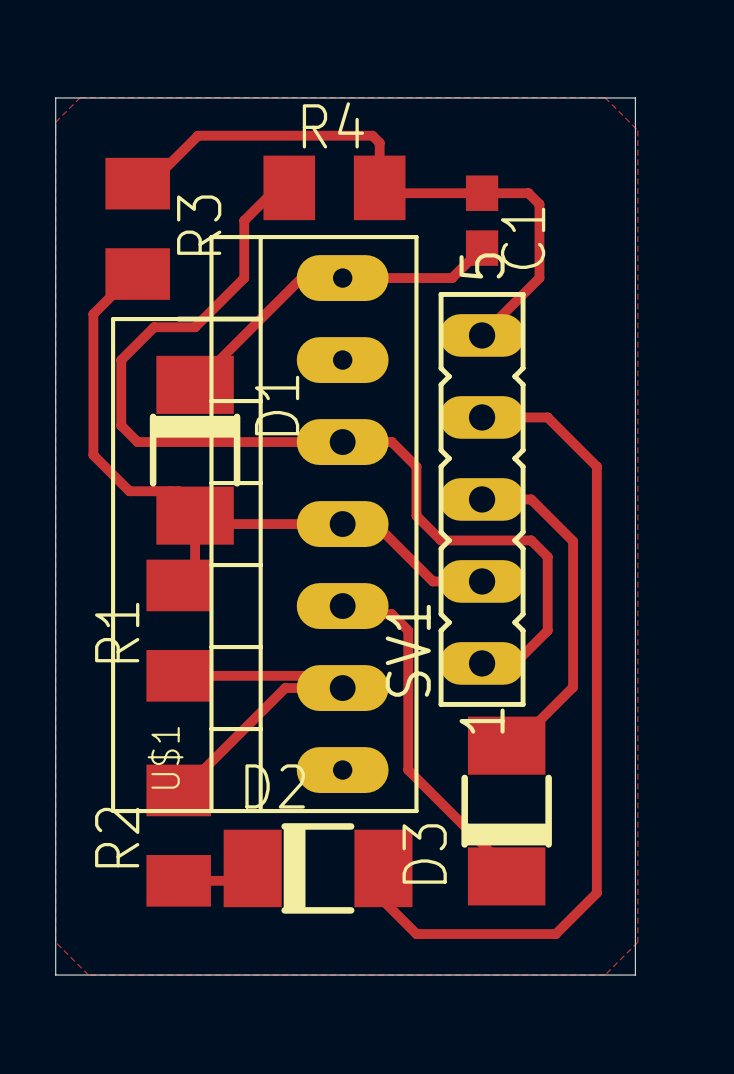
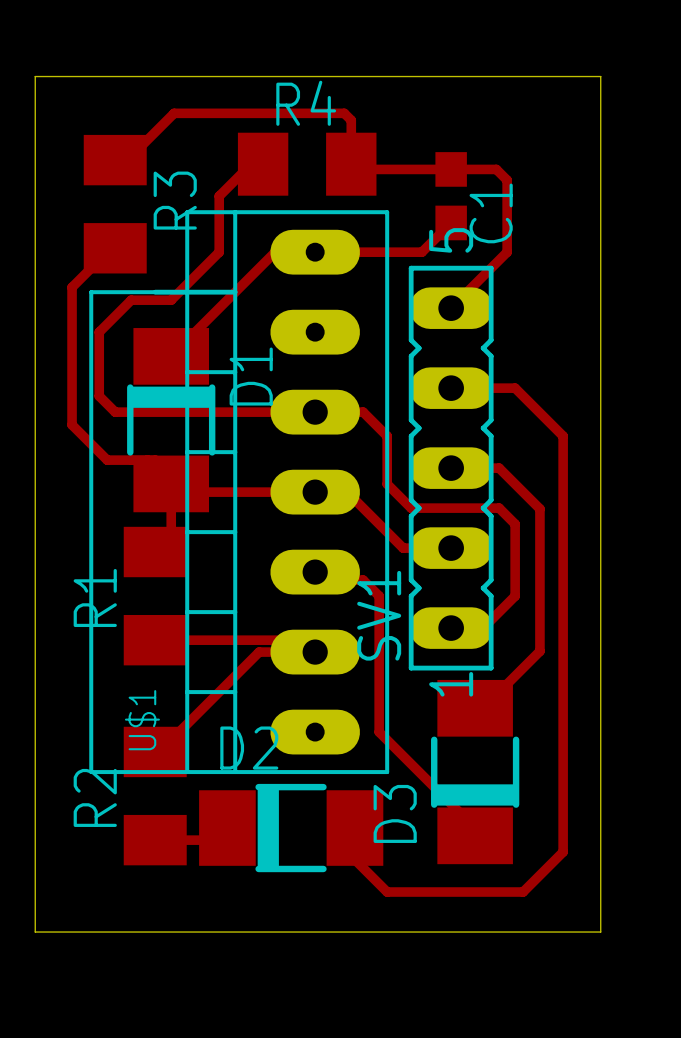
zone outline: (80, 97) (55, 122) (55, 942) (88, 975) (605, 975) (637, 942) (637, 130) (605, 97) (80, 97) -> none

